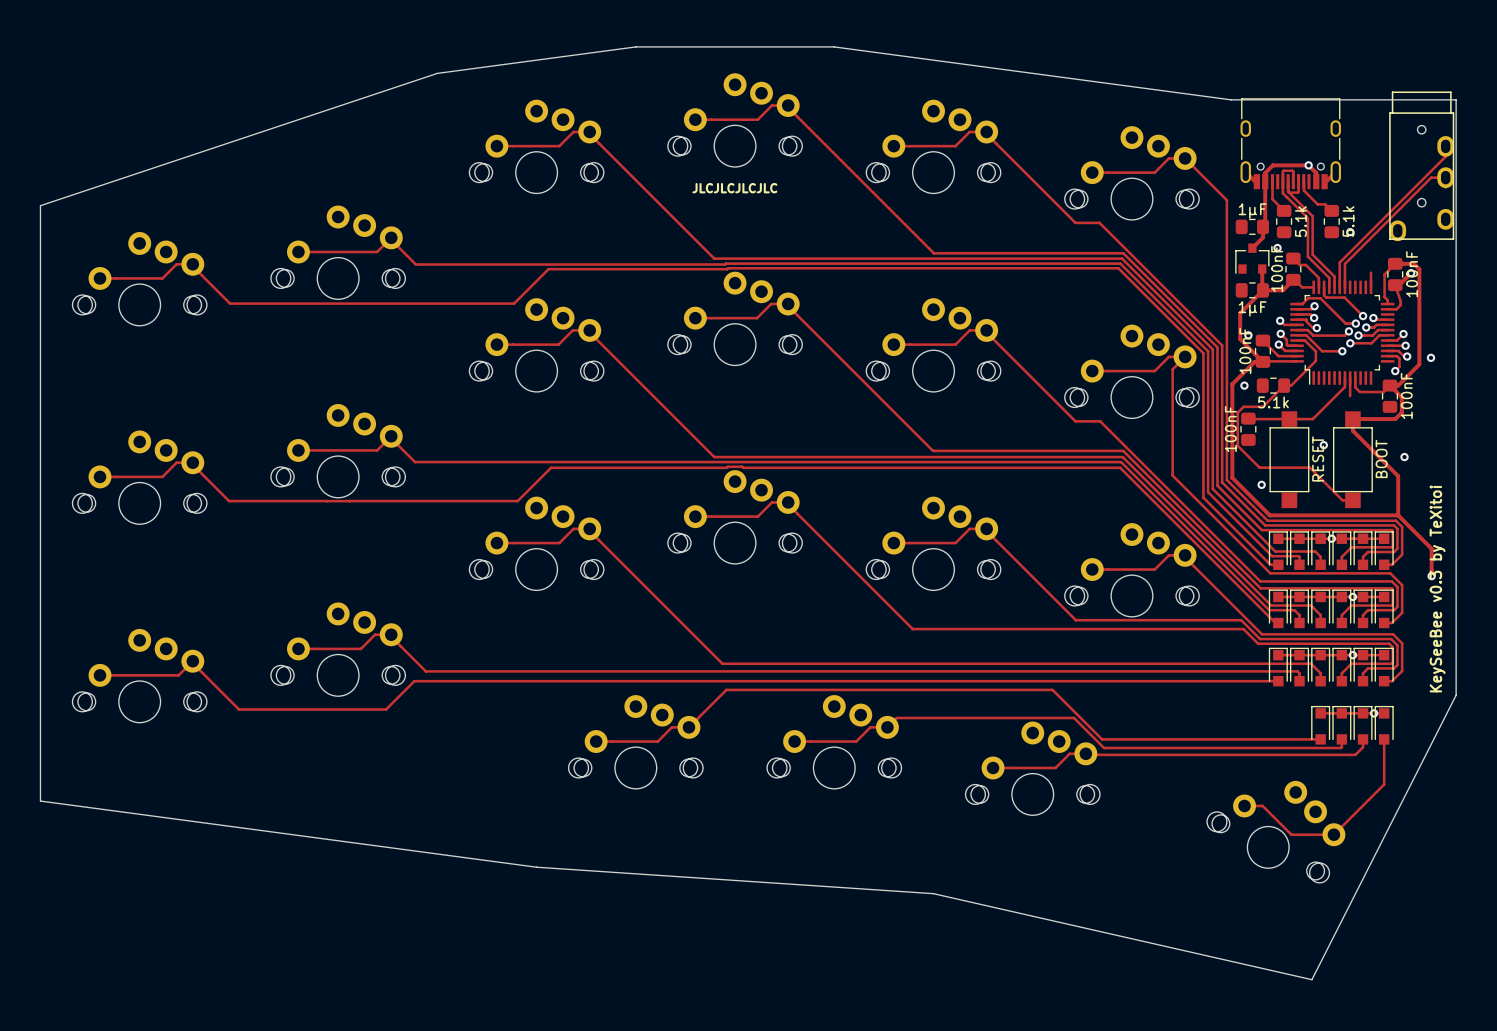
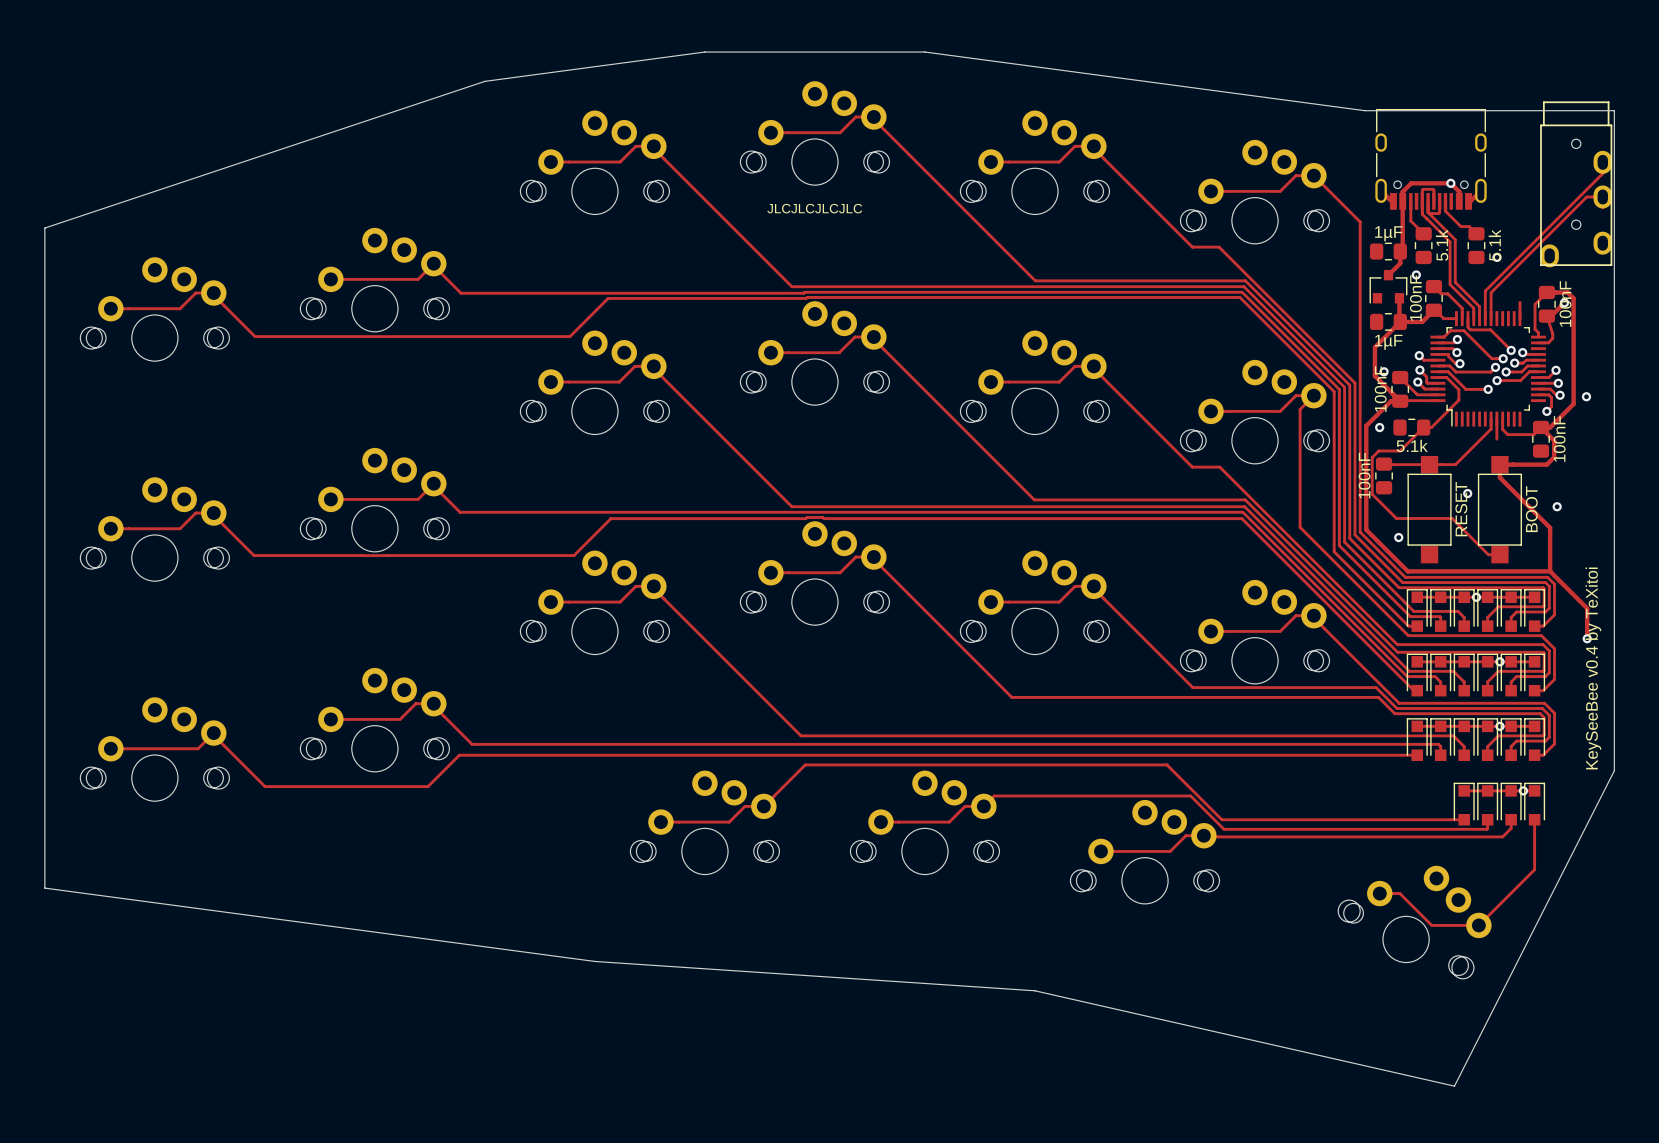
text: KeySeeBee v0.3 by TeXitoi (1437, 588) -> KeySeeBee v0.4 by TeXitoi (1593, 668)

